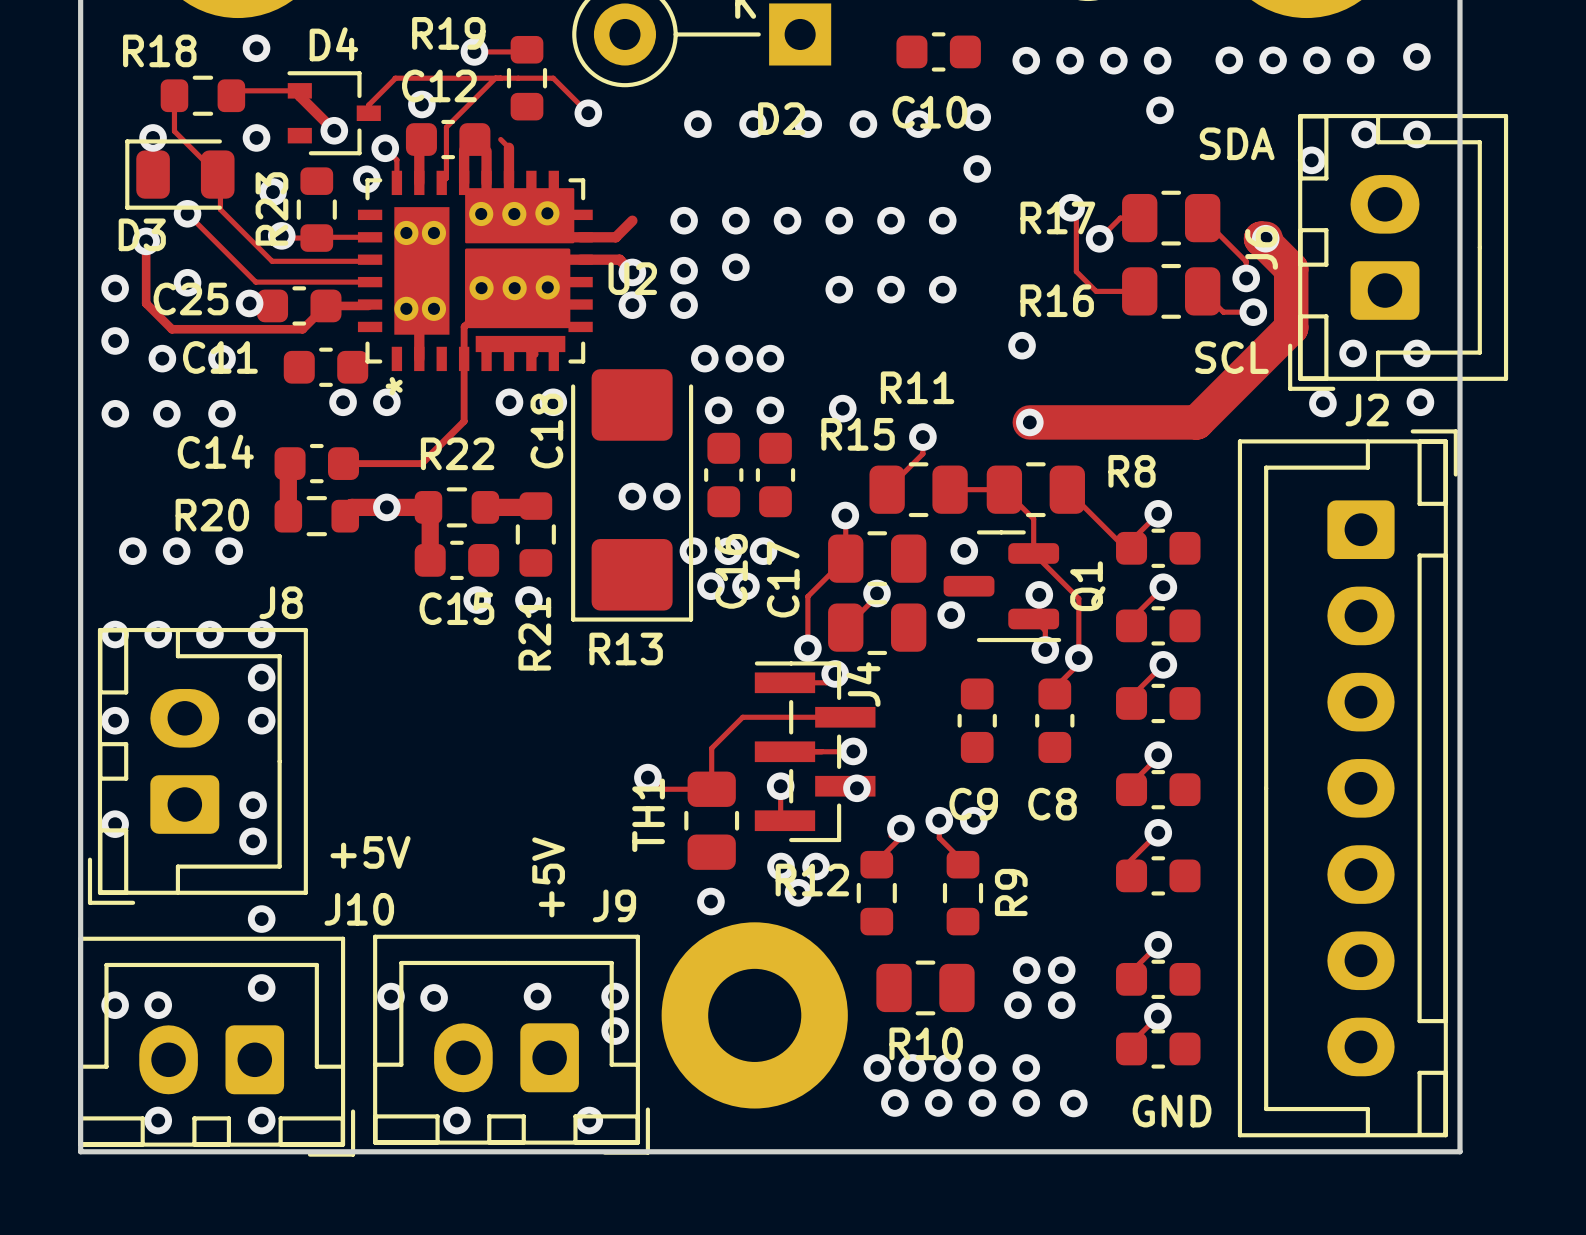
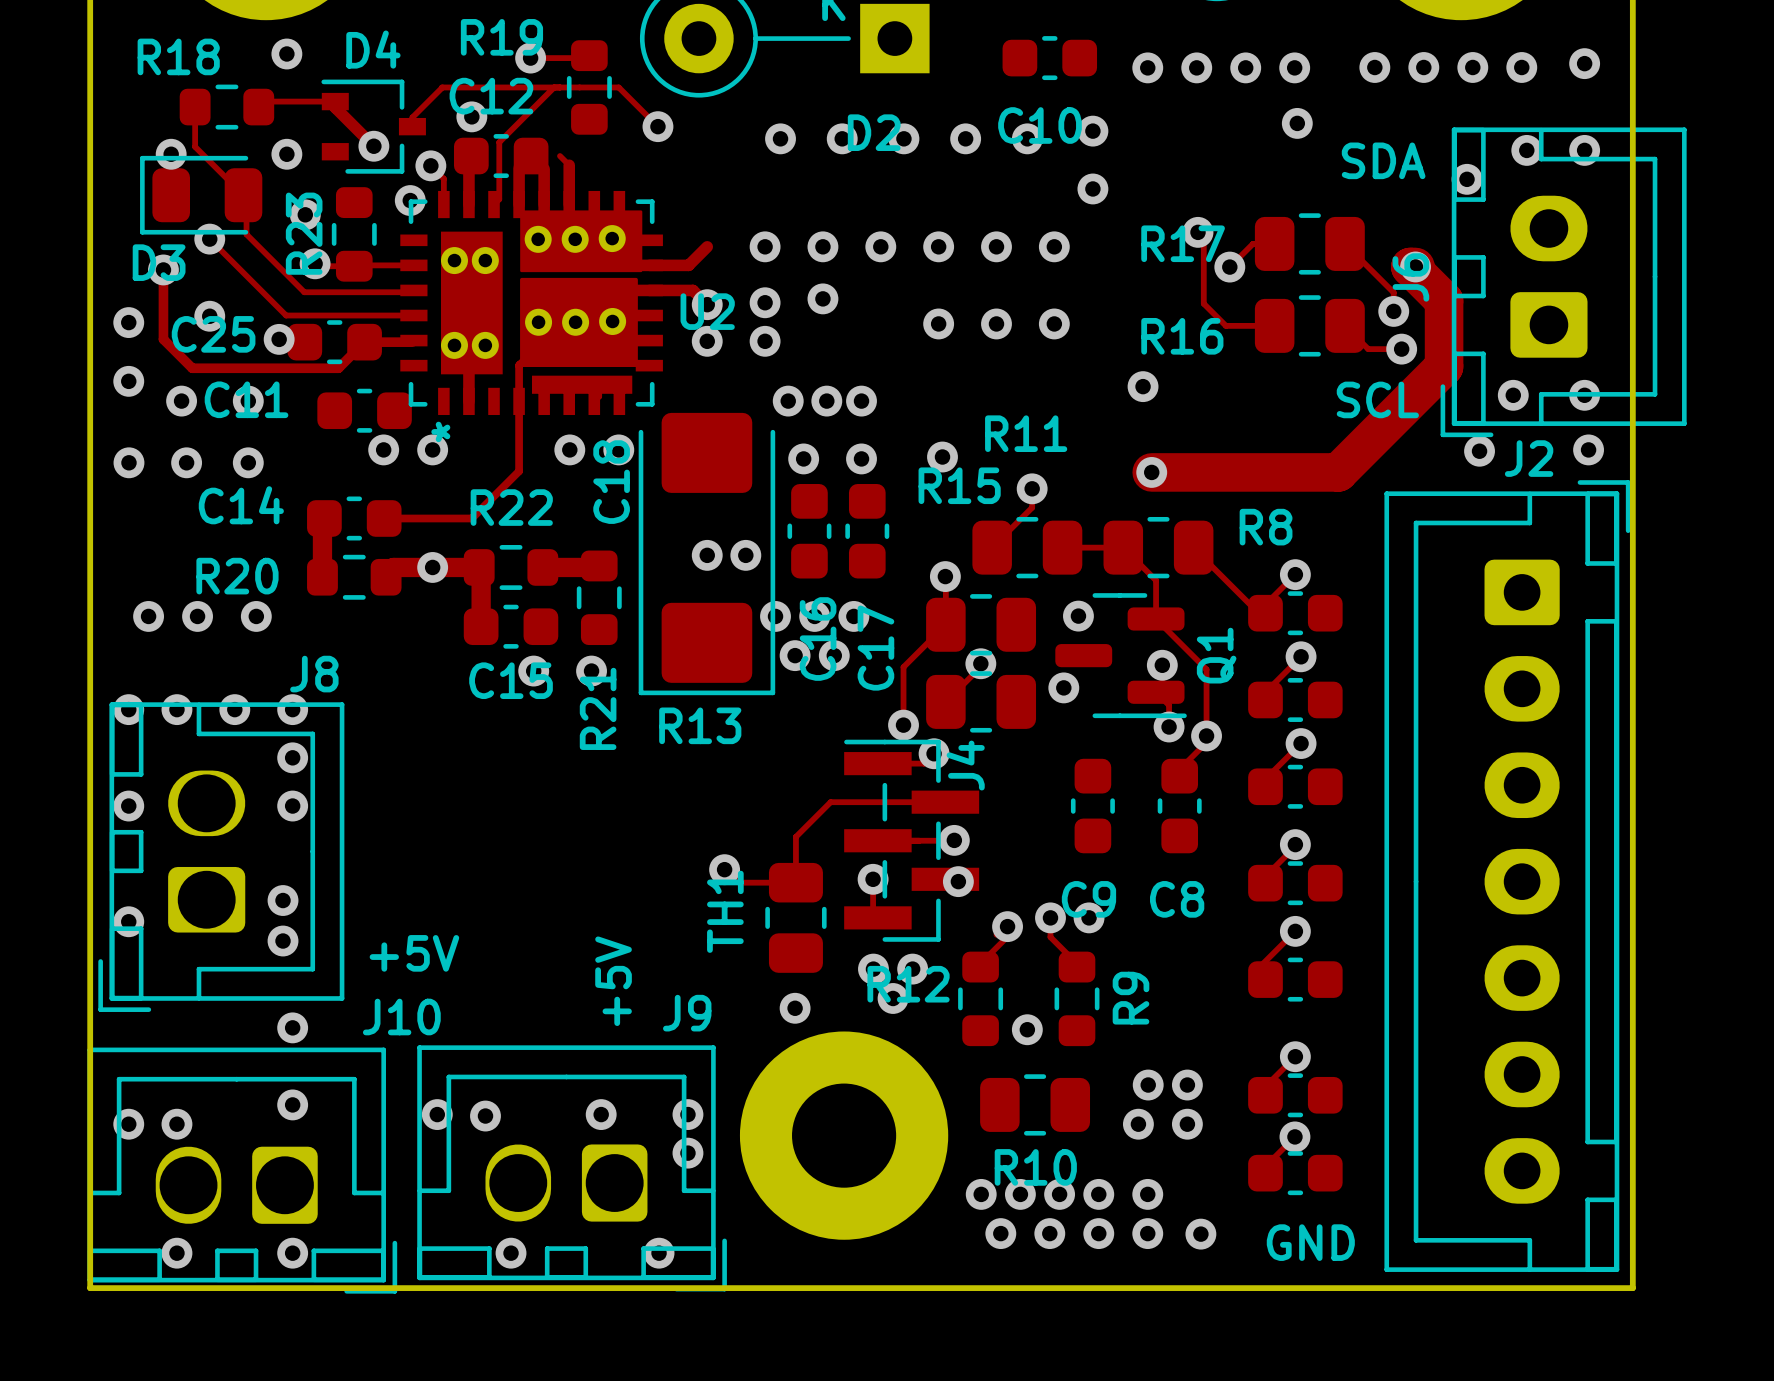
J8 footprint: [87, 627, 308, 905] -> [98, 702, 345, 1012]
via: none -> (1027, 1029)
J9 footprint: [373, 934, 650, 1155] -> [417, 1045, 727, 1292]
J10 footprint: [78, 936, 356, 1157] -> [87, 1047, 398, 1294]

